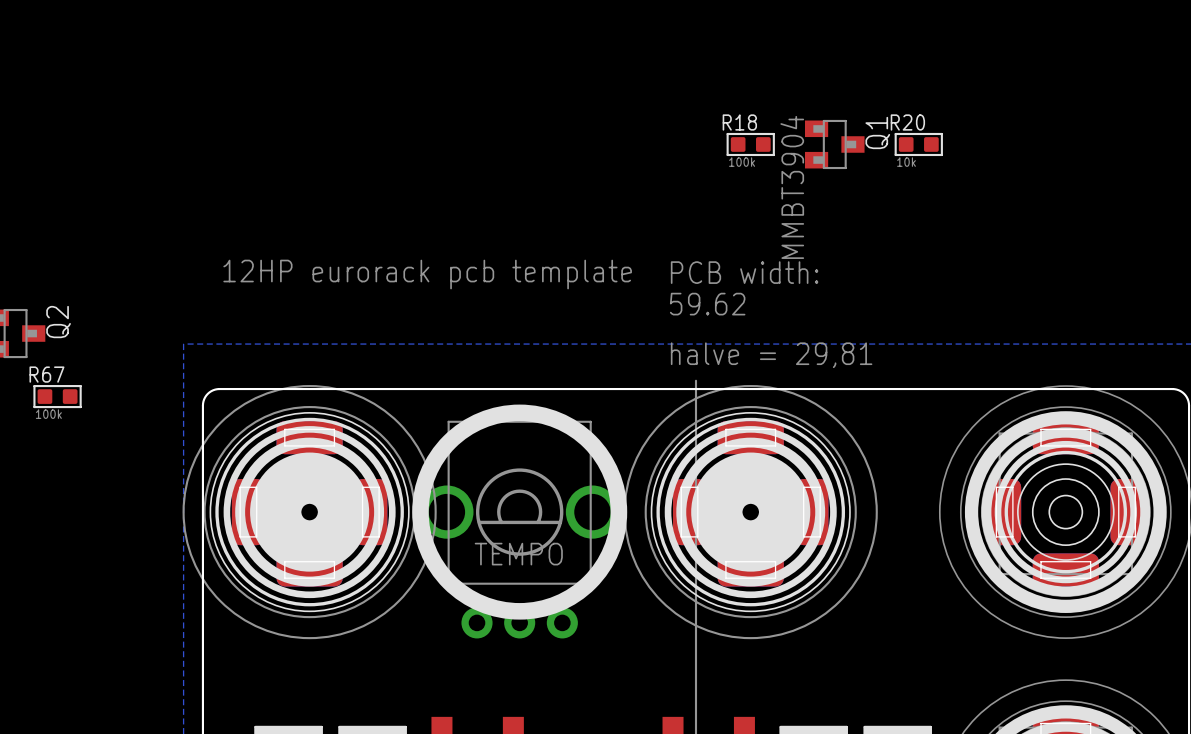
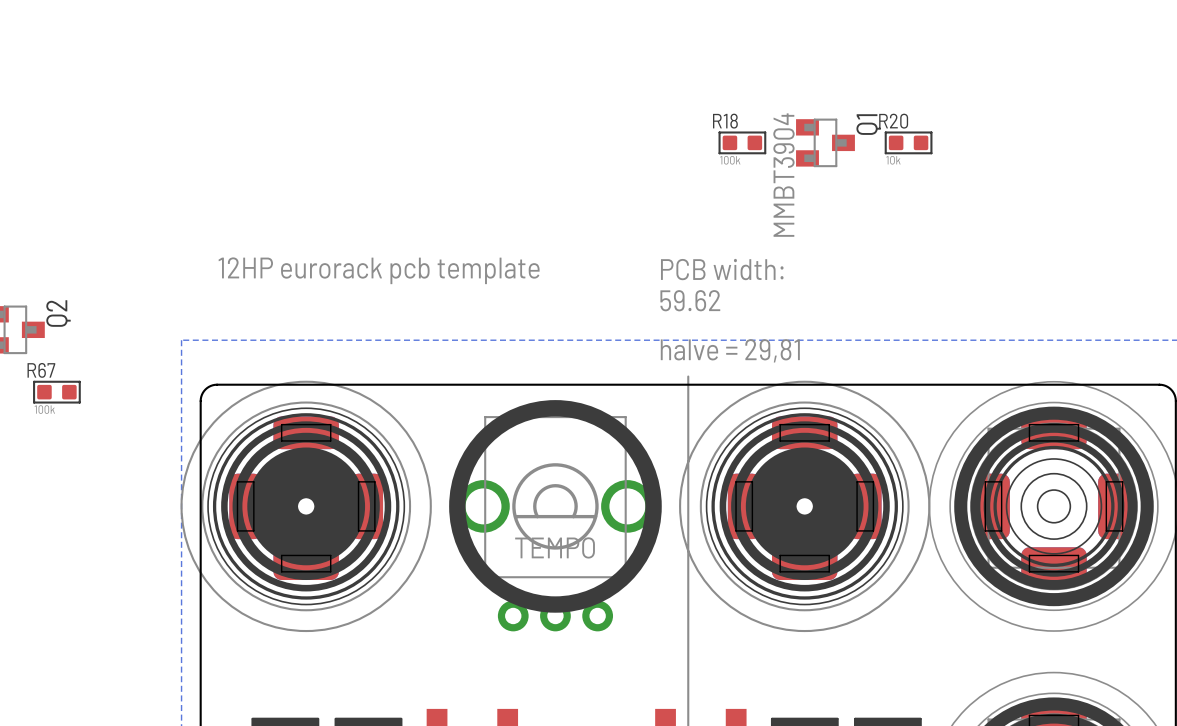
part position: (750, 512) -> (804, 506)
part position: (519, 521) -> (555, 515)

